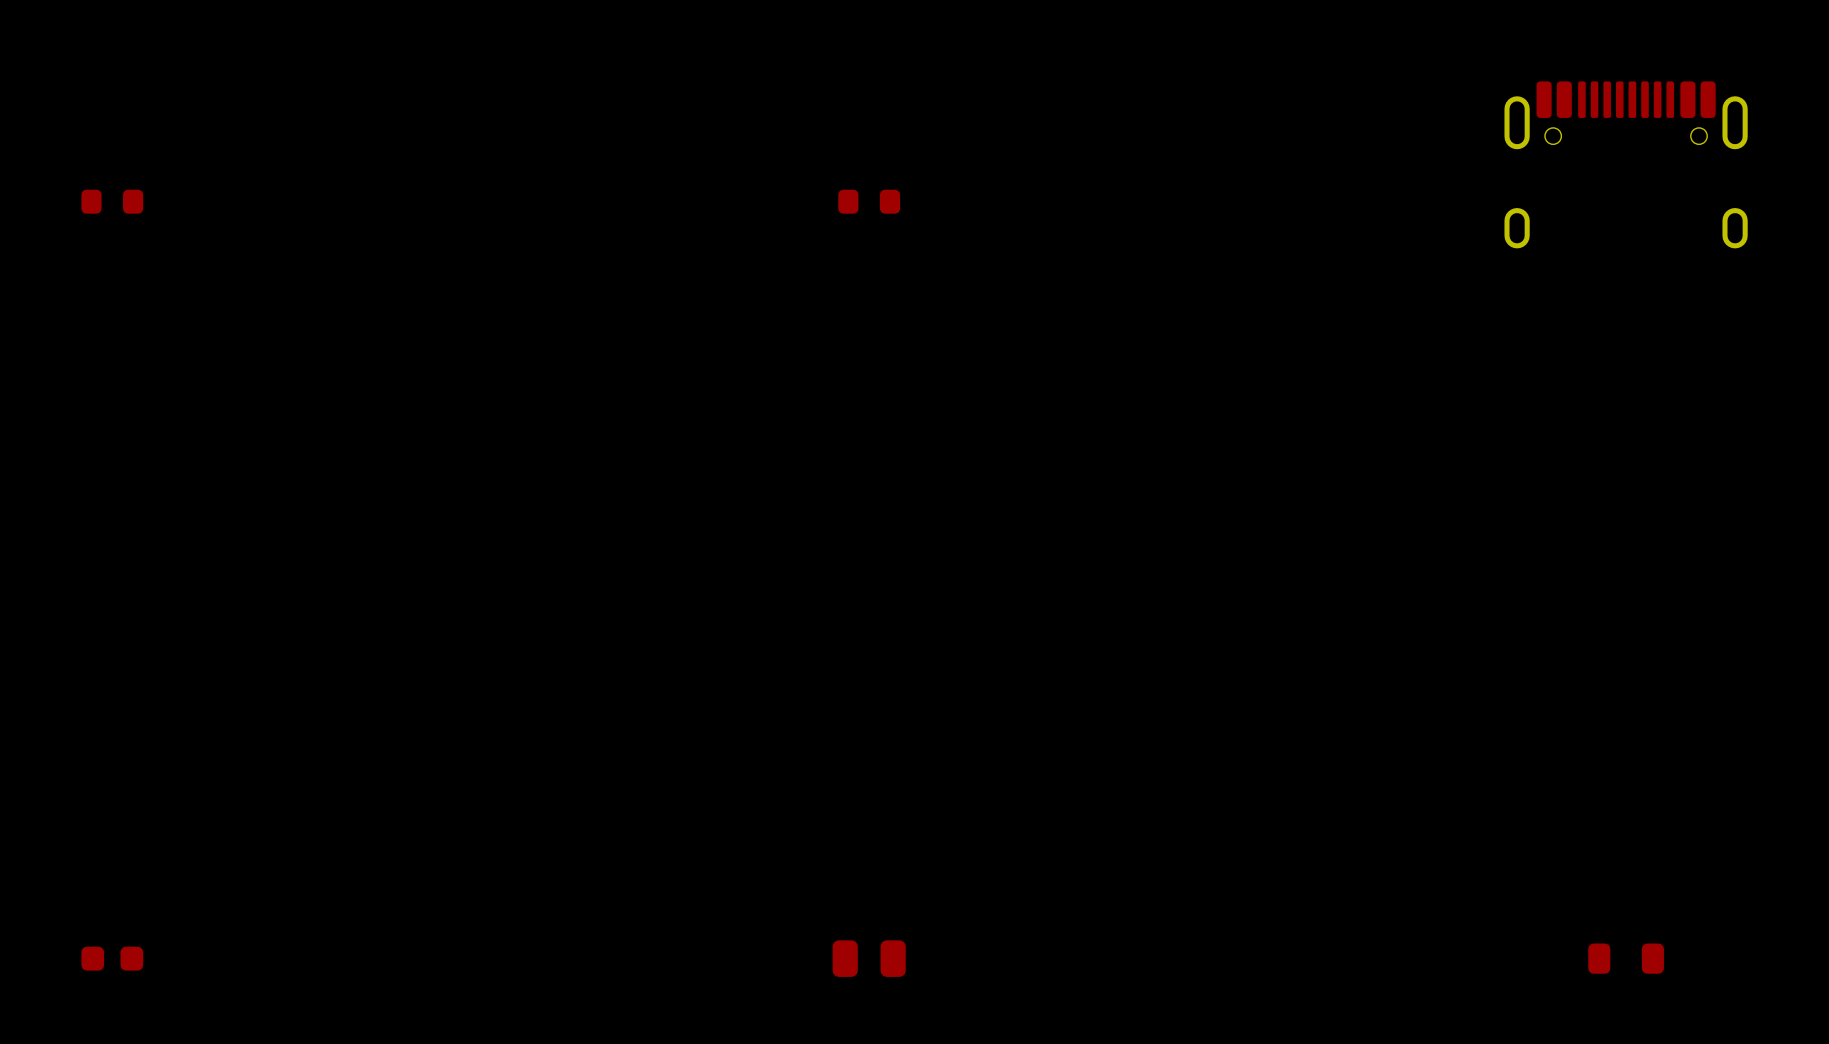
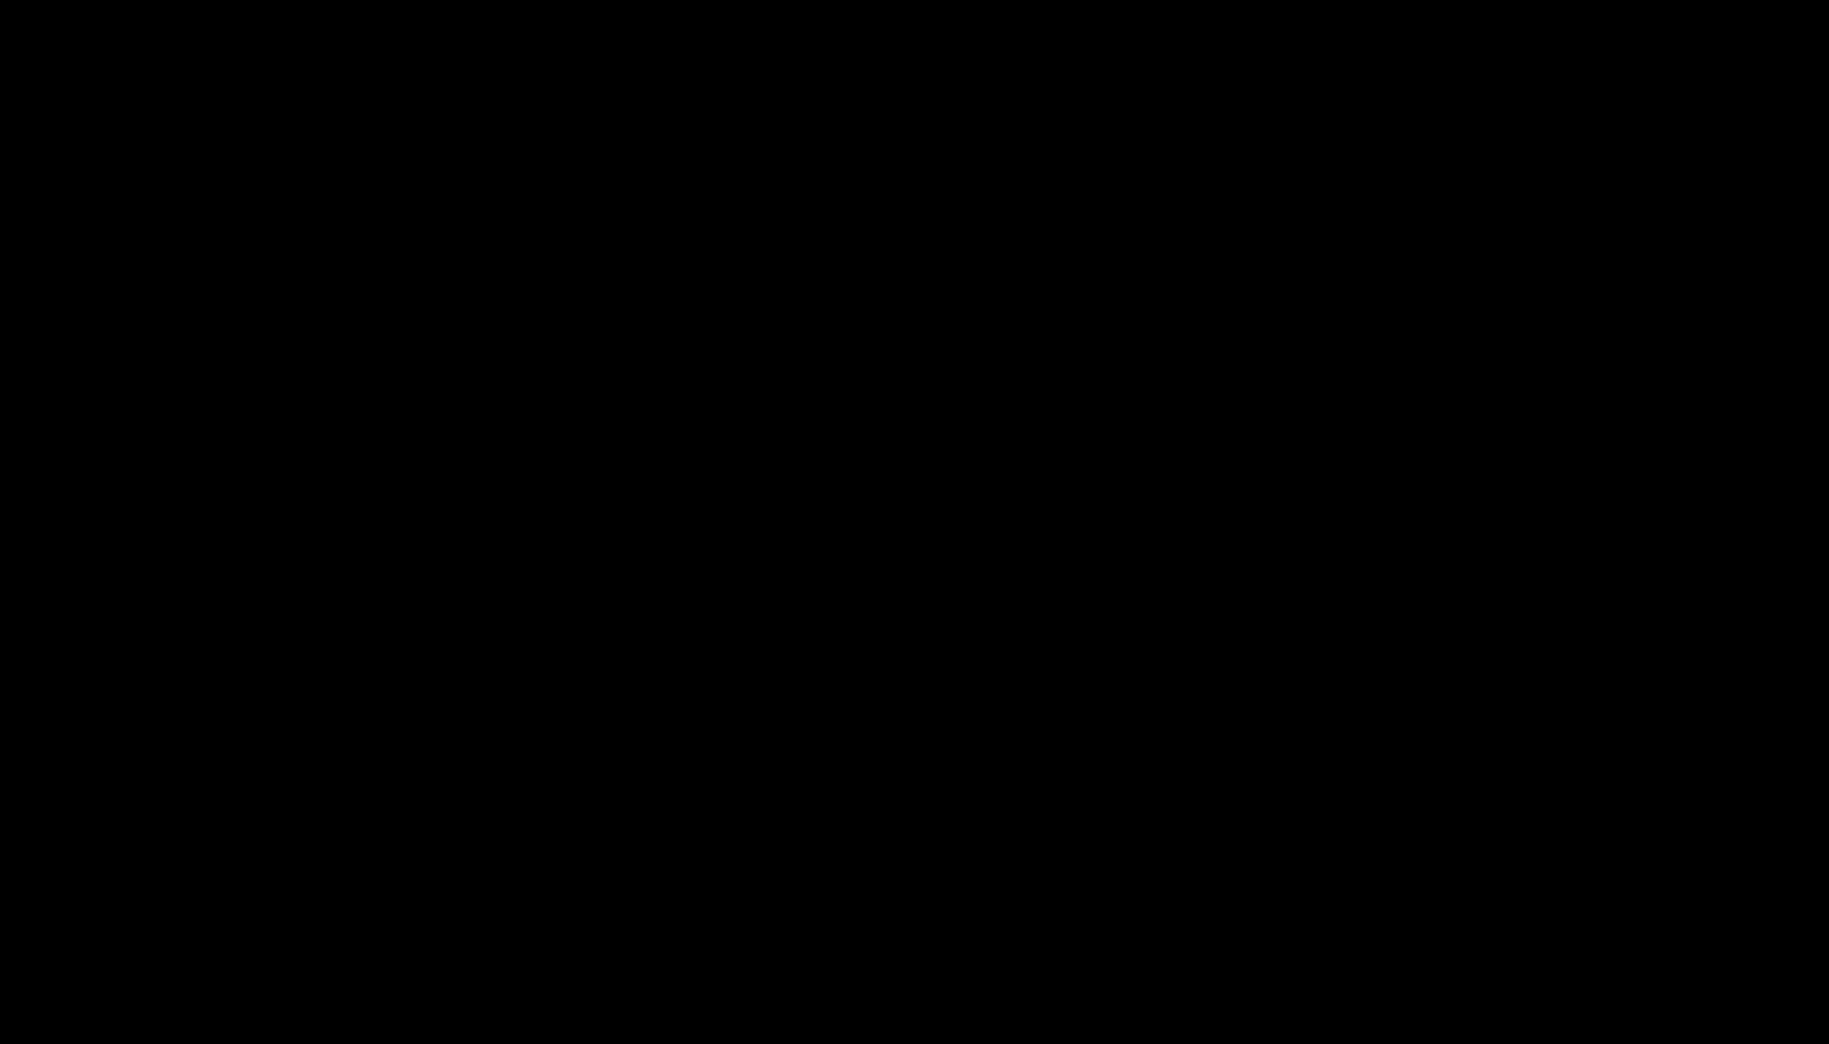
part: (1626, 164) -> none
part: (112, 201) -> none
part: (869, 201) -> none
part: (112, 958) -> none
part: (869, 958) -> none
part: (1626, 958) -> none

